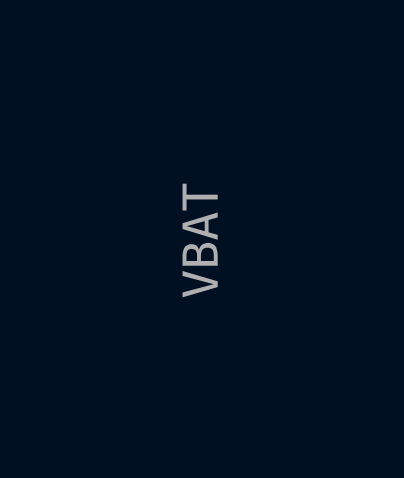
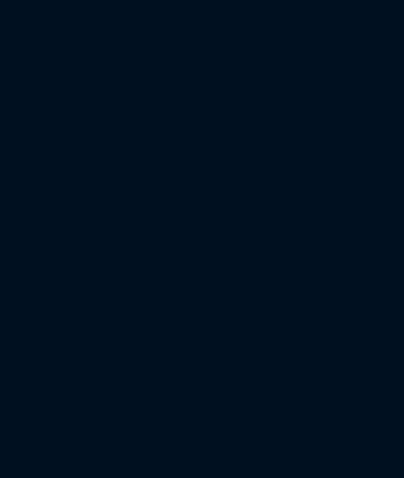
text: VBAT (200, 240) -> none

